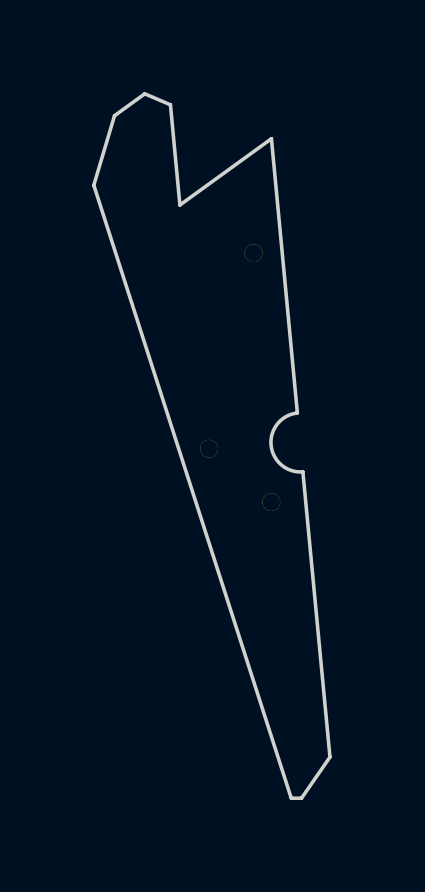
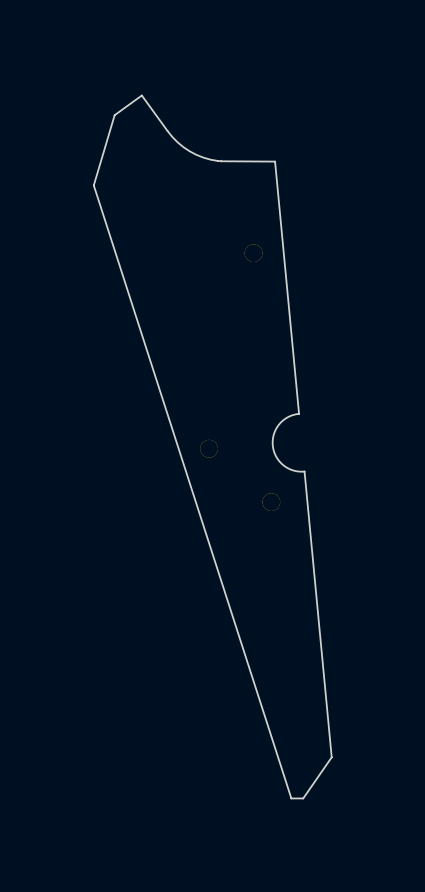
board edge: (144, 93) (170, 104) (179, 205) (271, 138) (297, 412) (286, 416) (277, 423) (272, 433) (271, 445) (274, 456) (281, 465) (291, 470) (302, 471) (329, 757) (301, 798) (291, 798) (93, 185) (114, 115) (144, 93) -> (141, 95) (172, 136) (183, 147) (196, 154) (219, 161) (275, 161) (299, 413) (288, 416) (280, 422) (274, 431) (272, 445) (275, 455) (284, 466) (294, 470) (304, 471) (331, 757) (303, 798) (291, 798) (93, 185) (114, 115) (141, 95)

